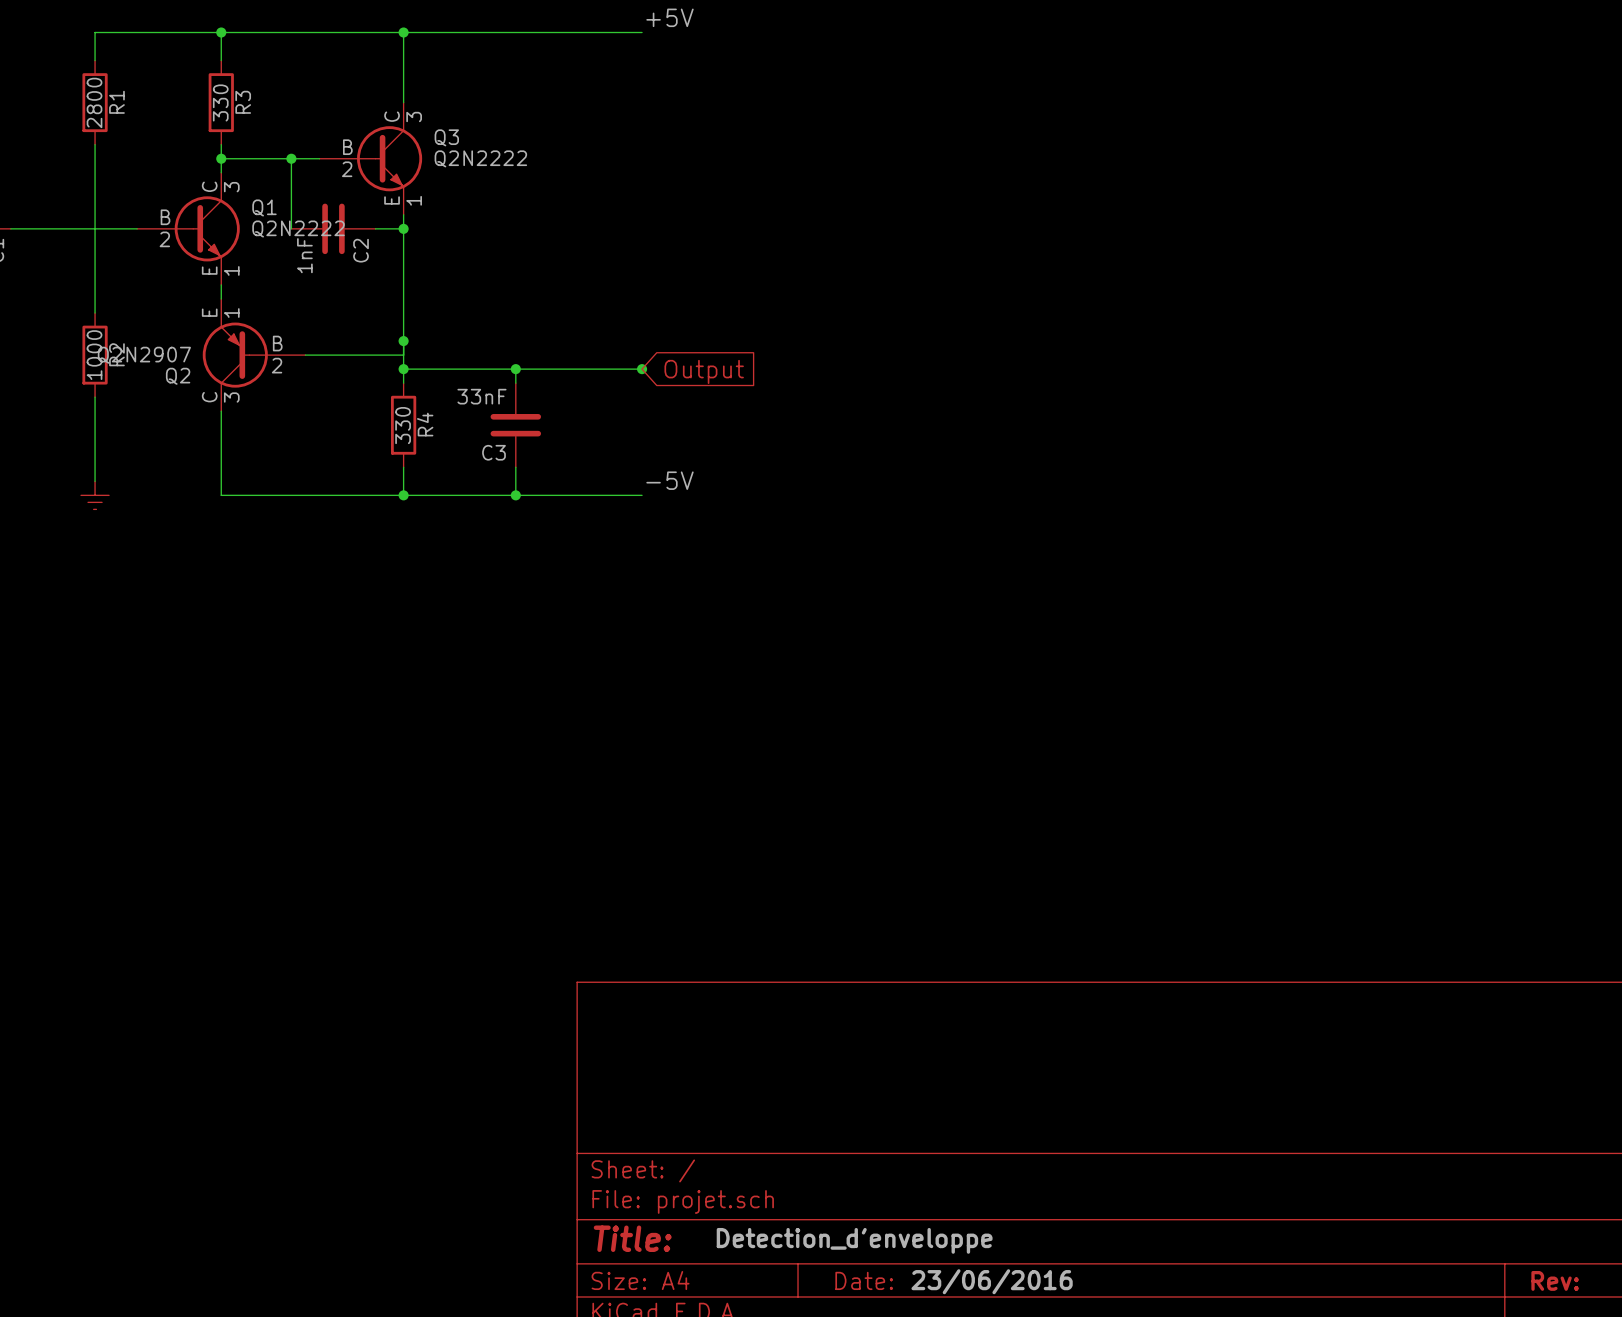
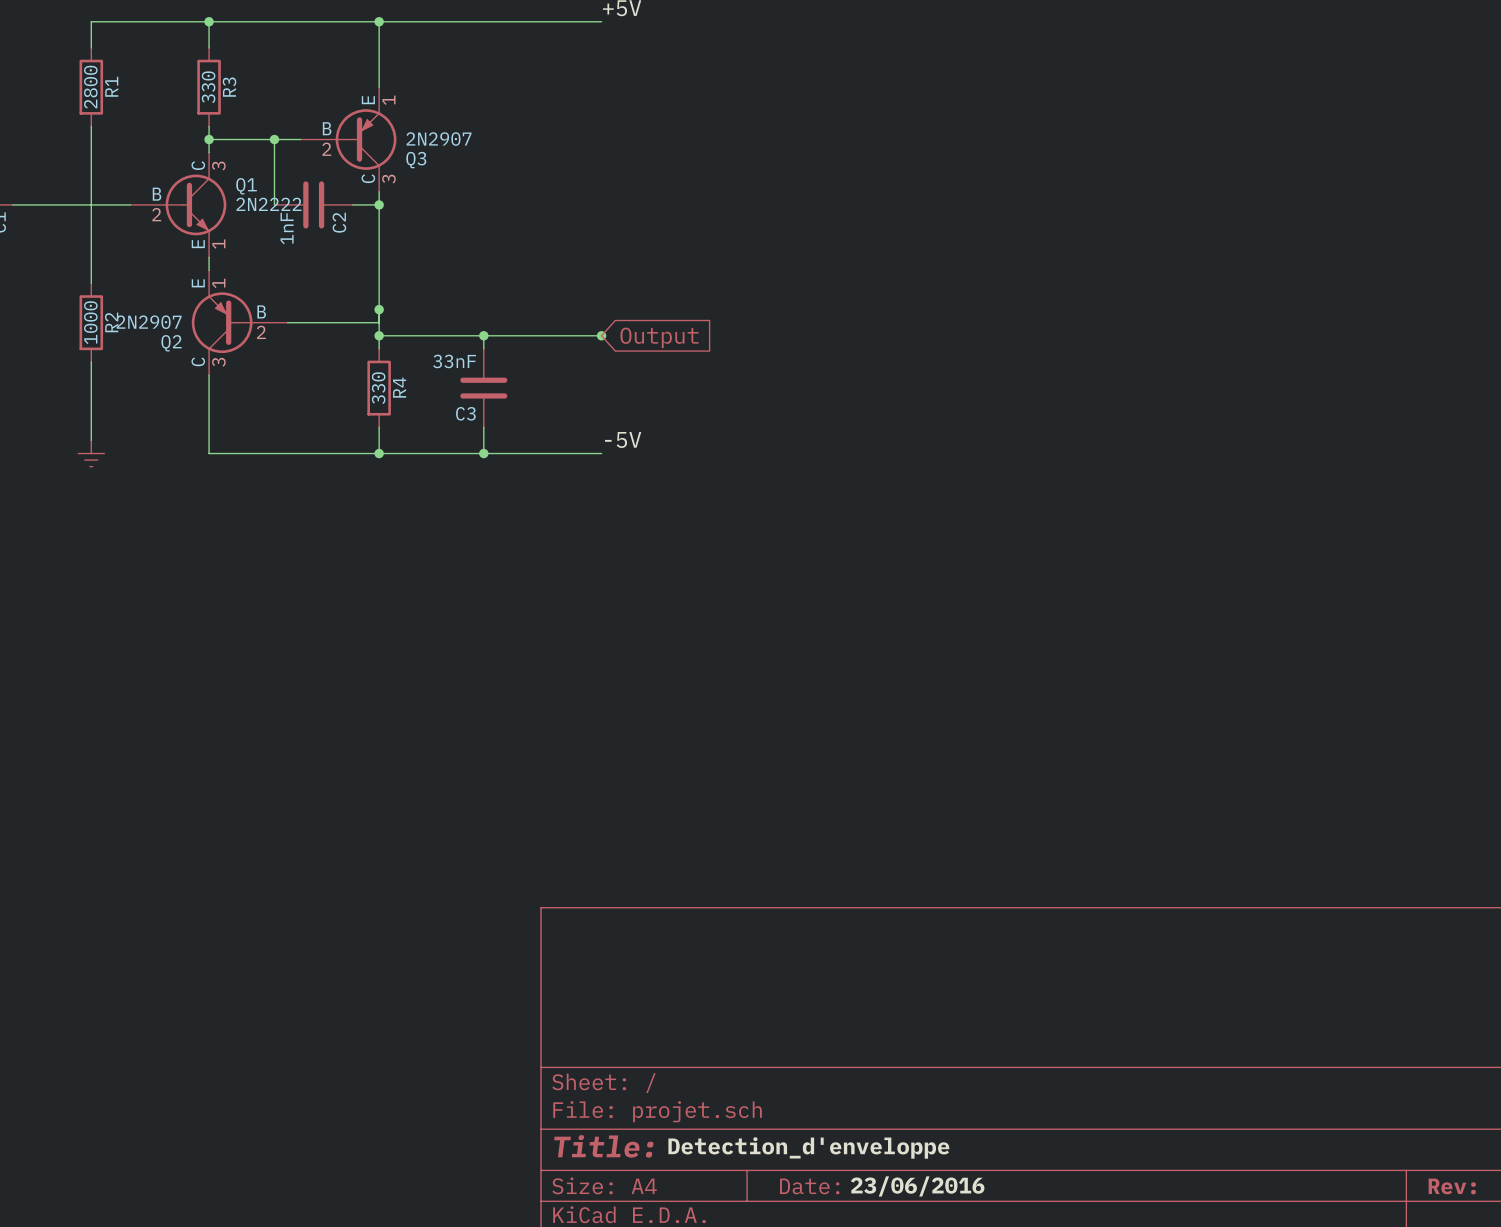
Q3 symbol: [319, 102, 423, 215] -> [300, 87, 397, 192]
Q3 name position: Q3 (446, 137) -> Q3 (416, 160)
Q3 value: Q2N2222 (480, 158) -> 2N2907 (439, 139)
Q1 value: Q2N2222 (298, 229) -> 2N2222 (268, 204)
Q2 value: Q2N2907 (144, 355) -> 2N2907 (149, 322)

